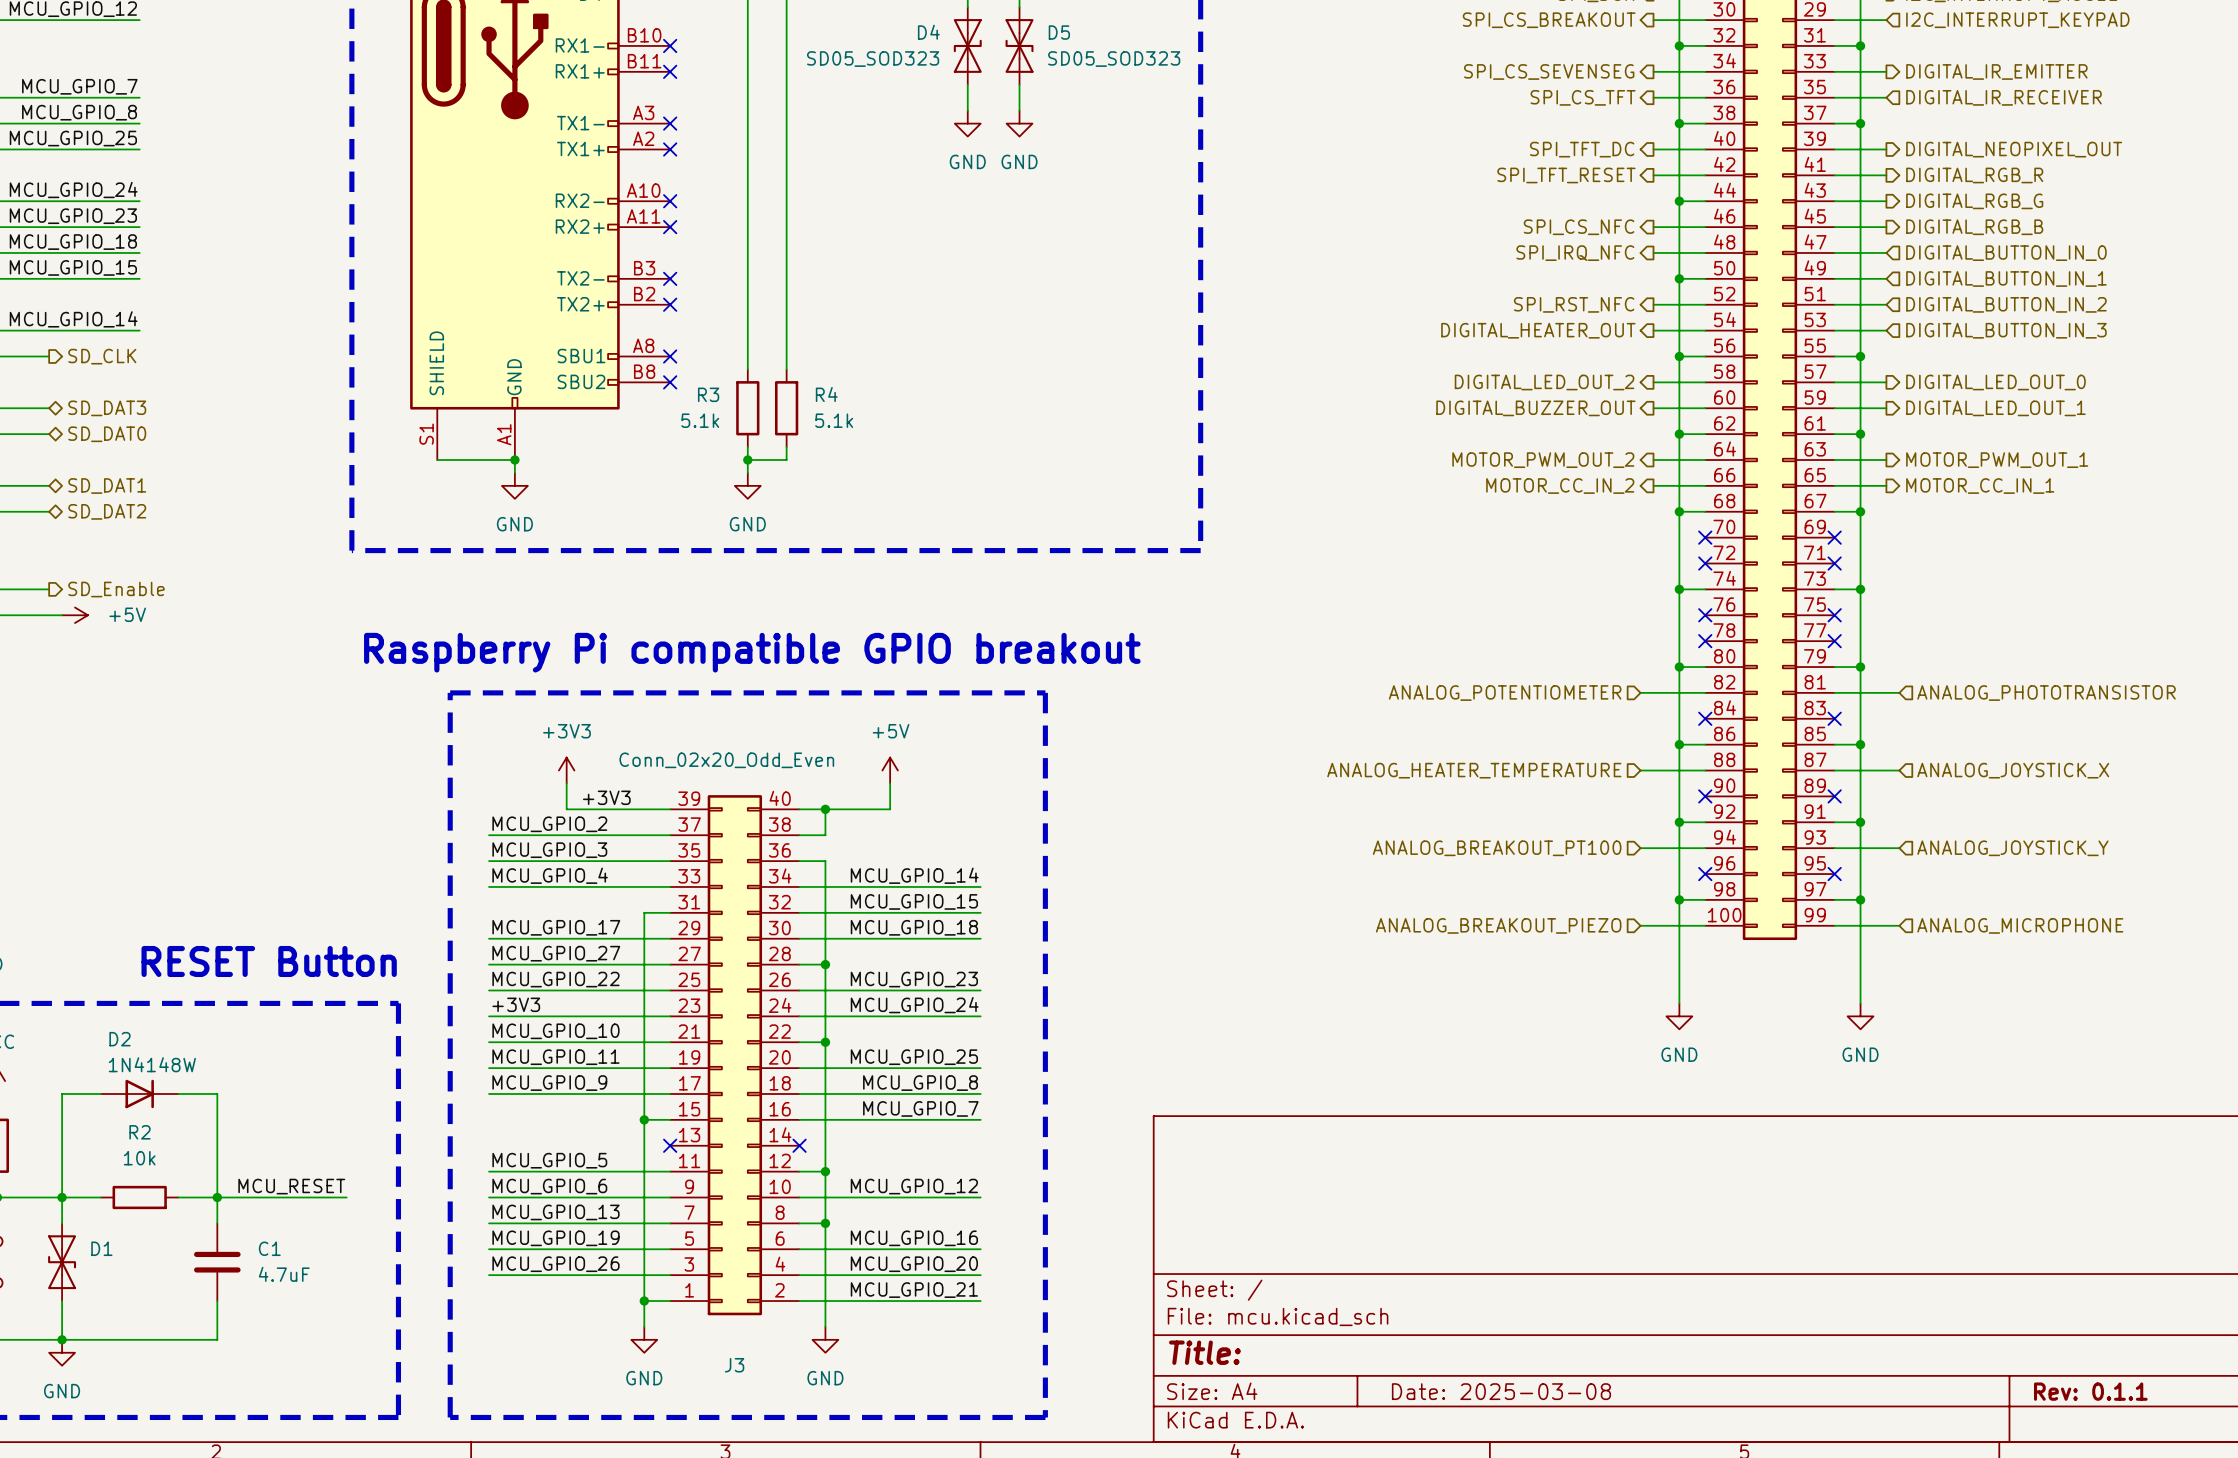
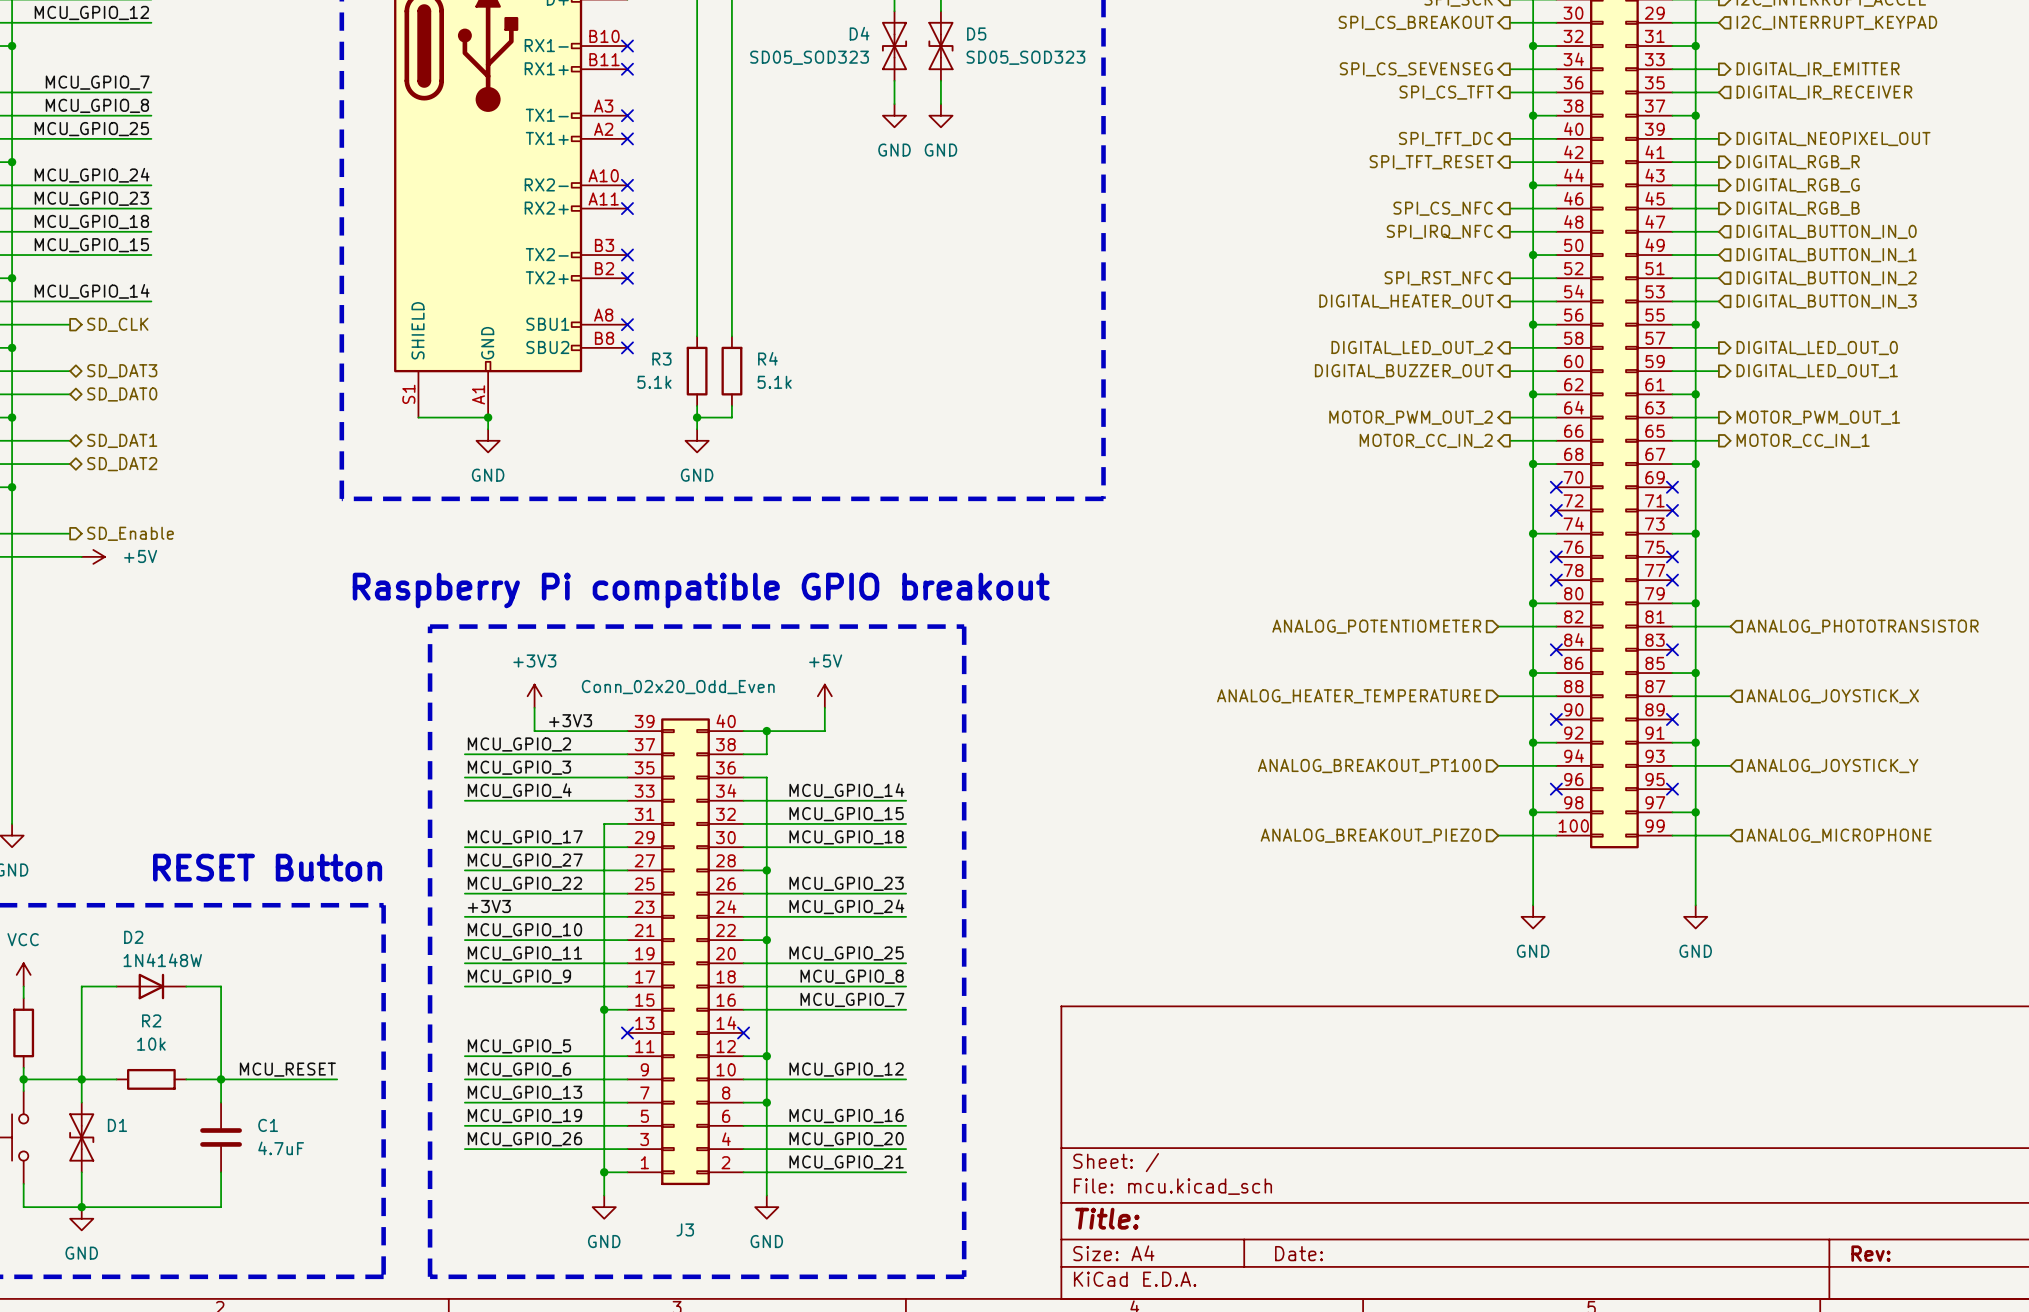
title block: Date: 2025-03-08 (1501, 1391) -> Date: (1299, 1253)
title block: Rev: 0.1.1 (2090, 1391) -> Rev: (1870, 1253)

